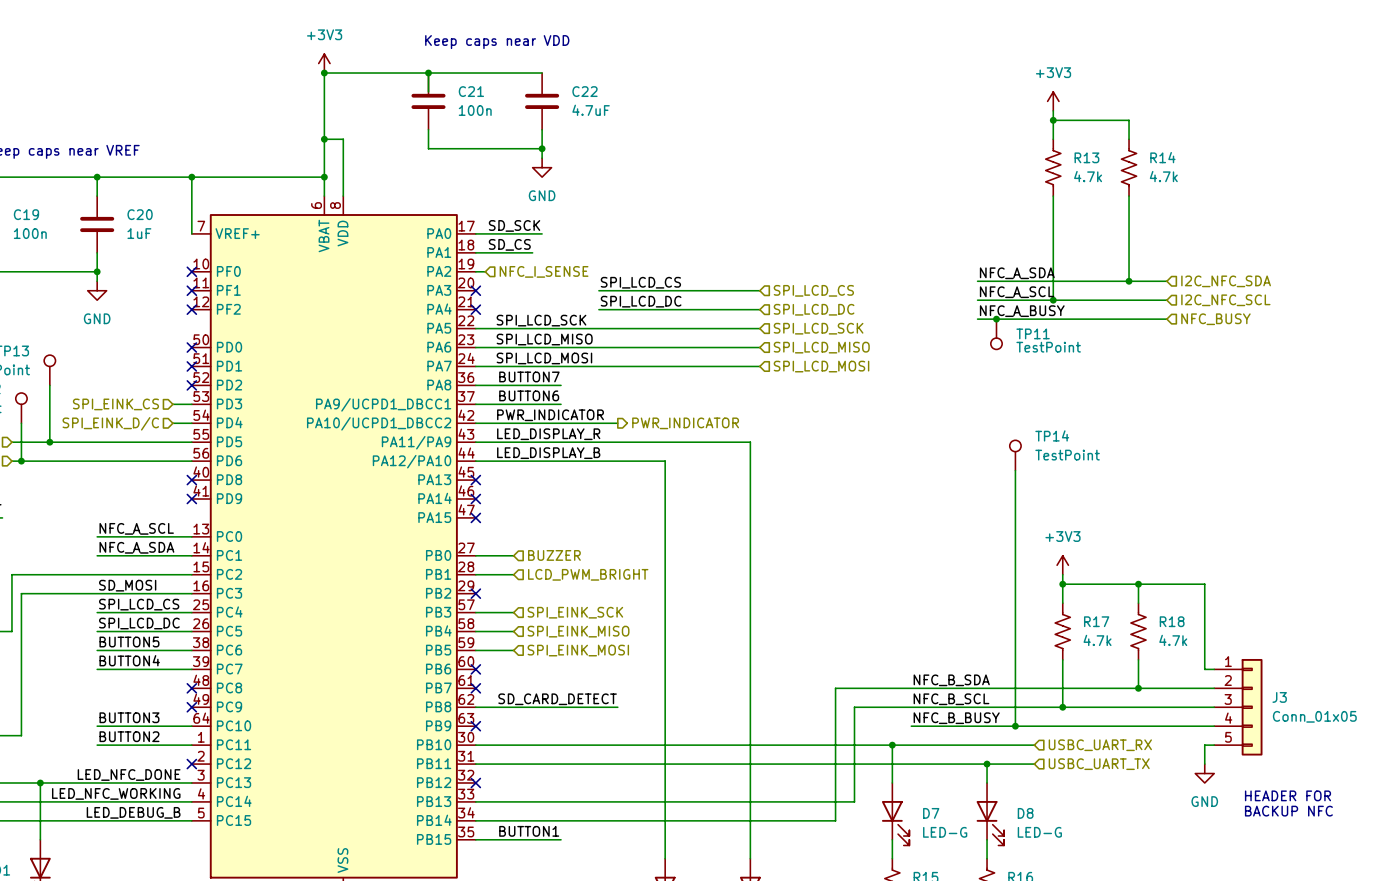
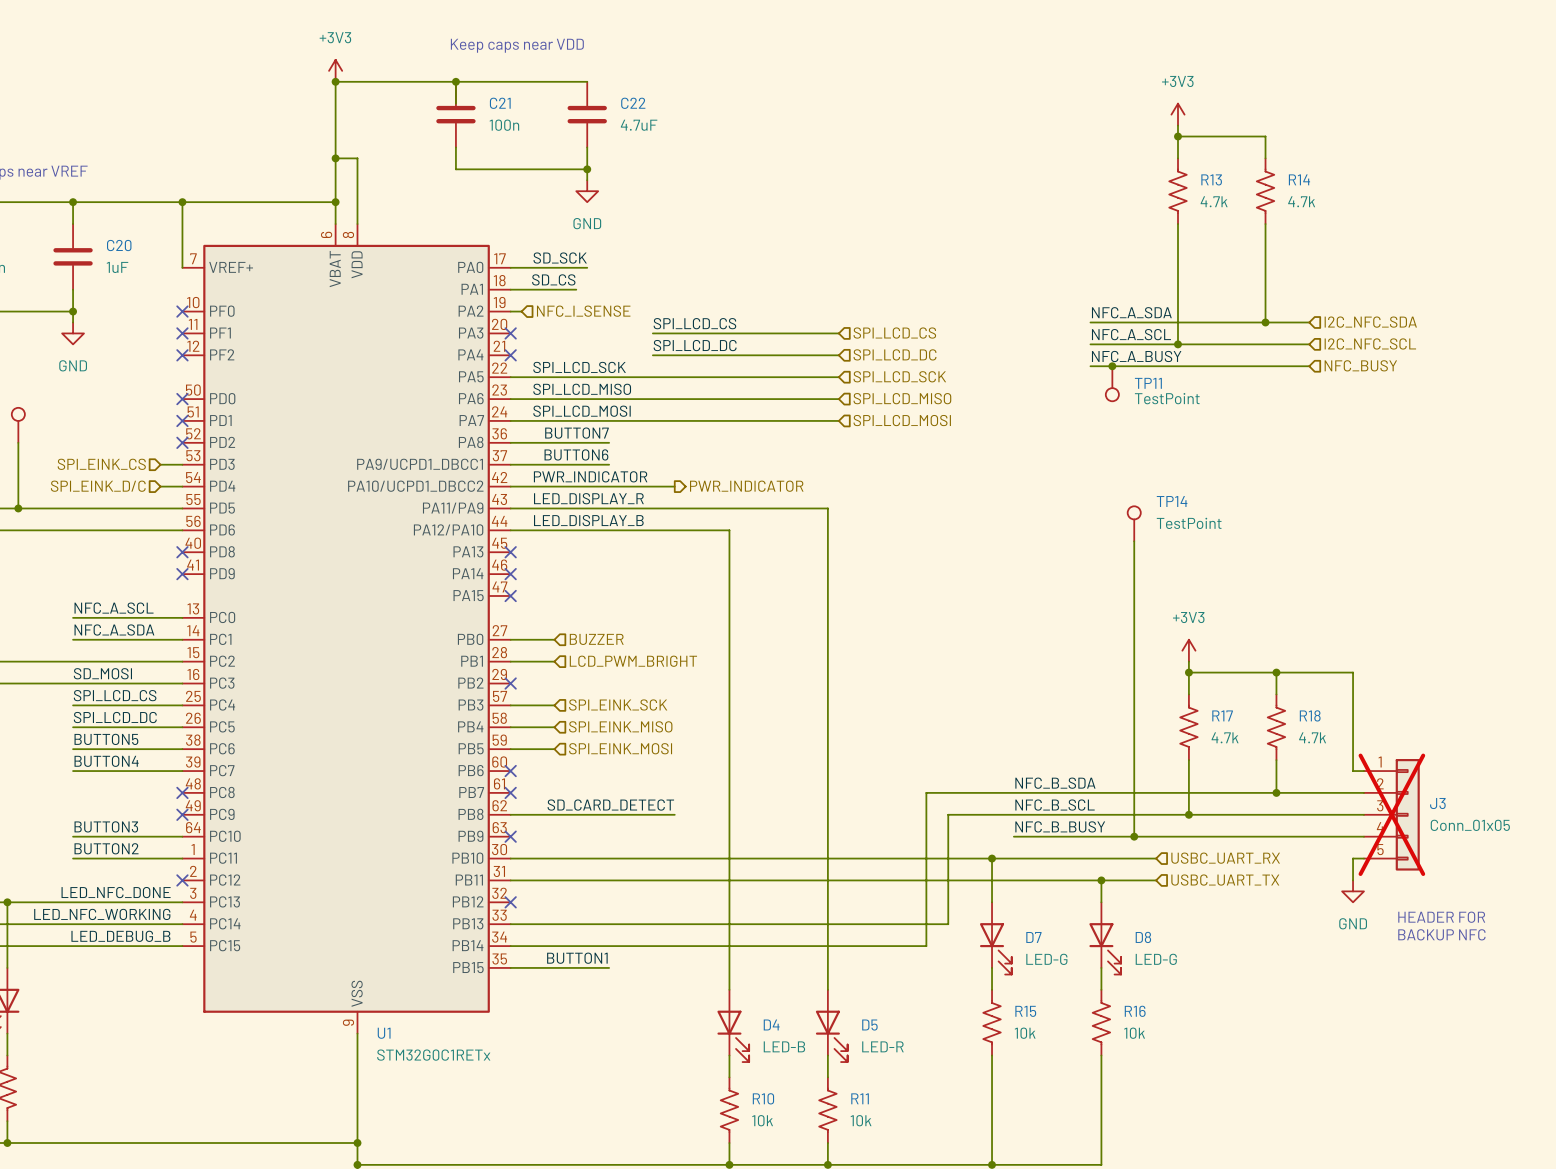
J3 do-not-place cross: none -> (1391, 814)

